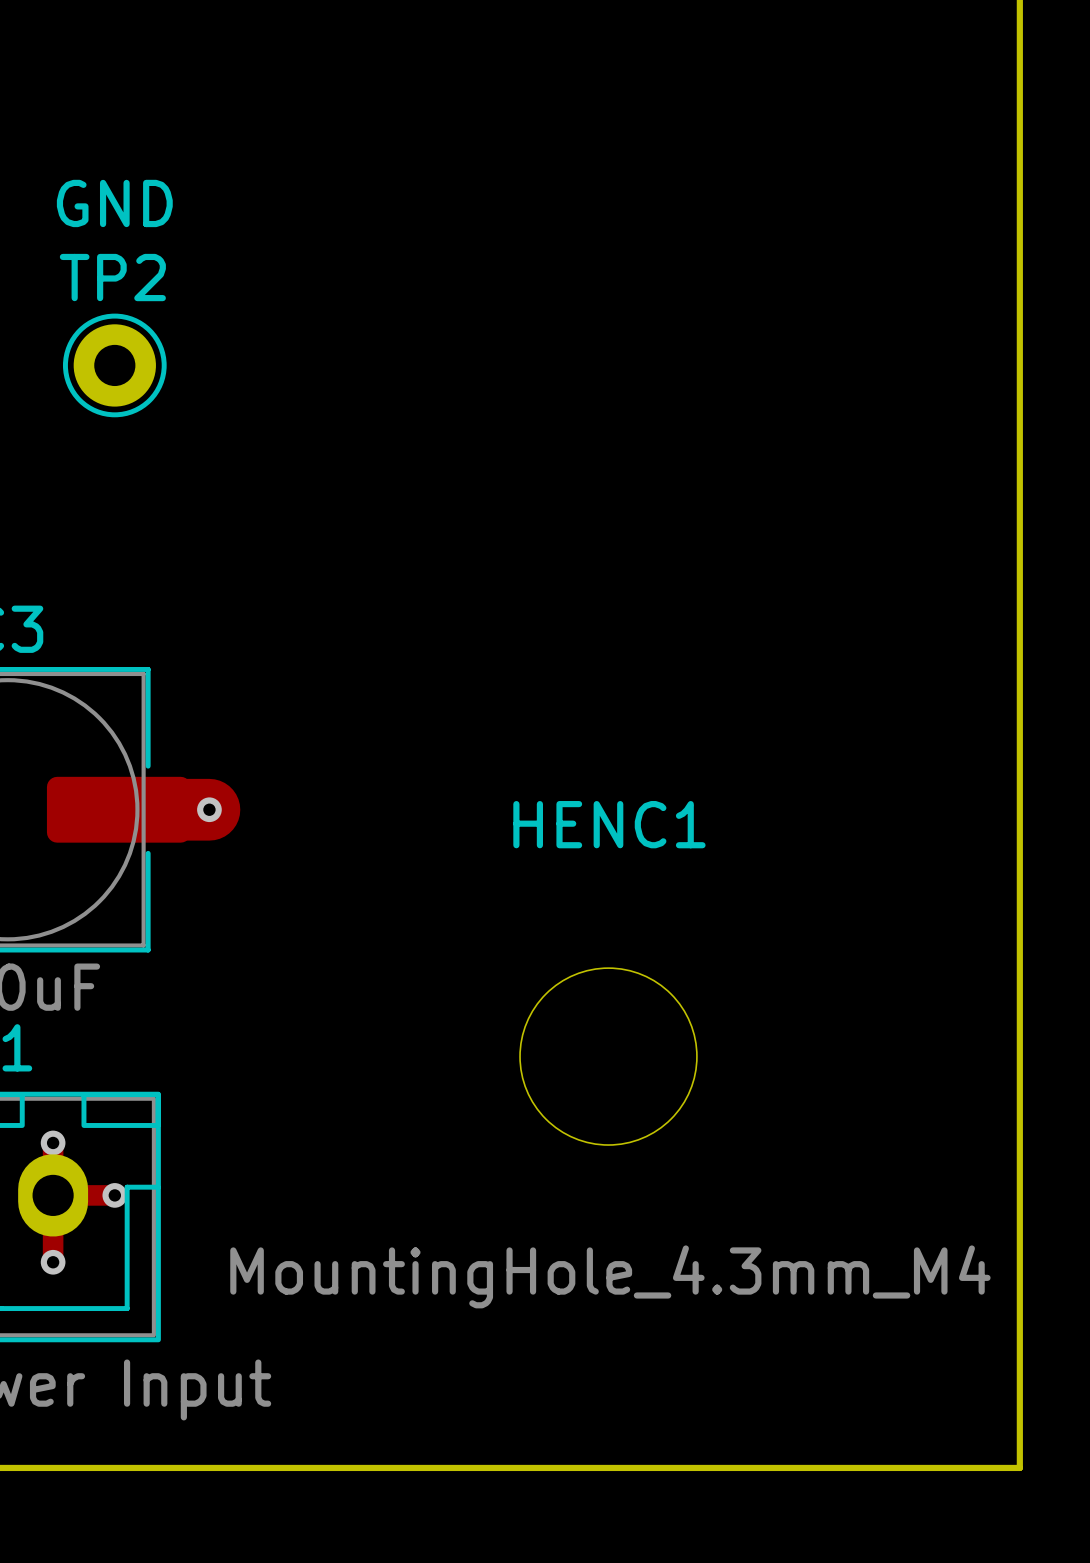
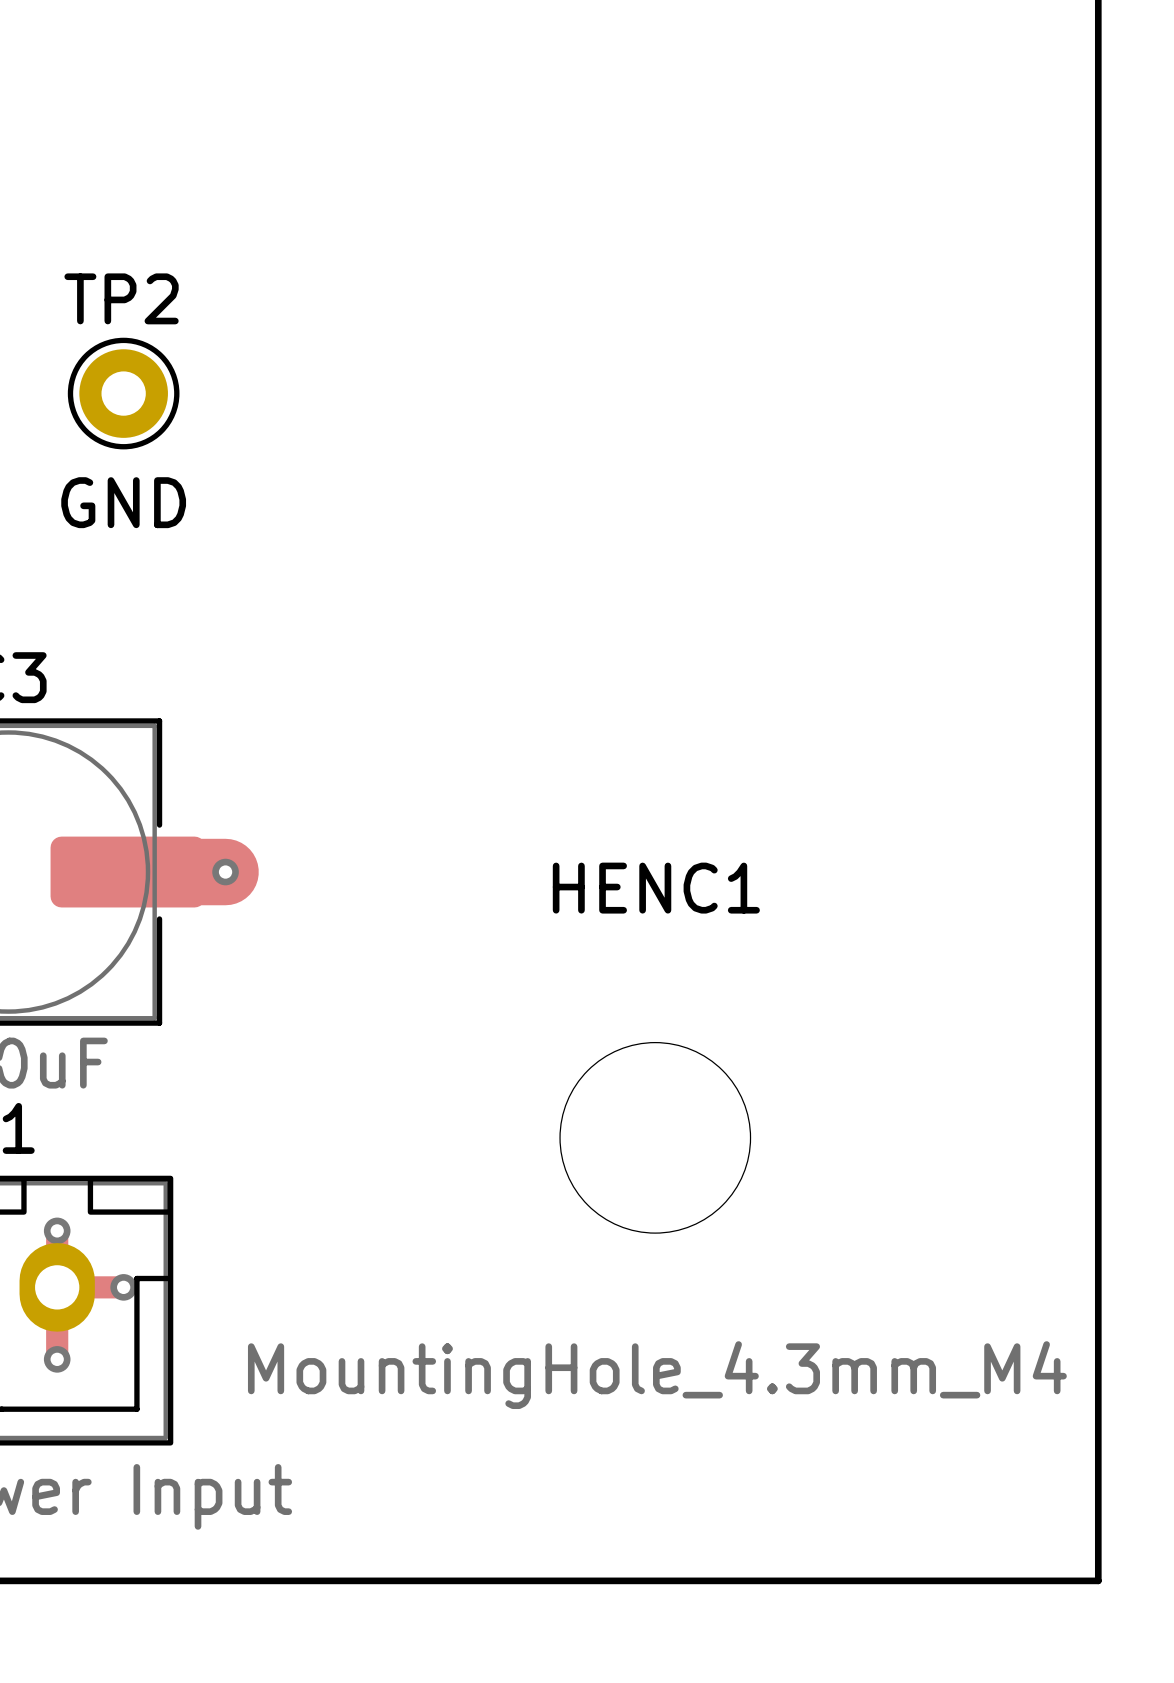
TP2 value position: GND (114, 203) -> GND (123, 502)

